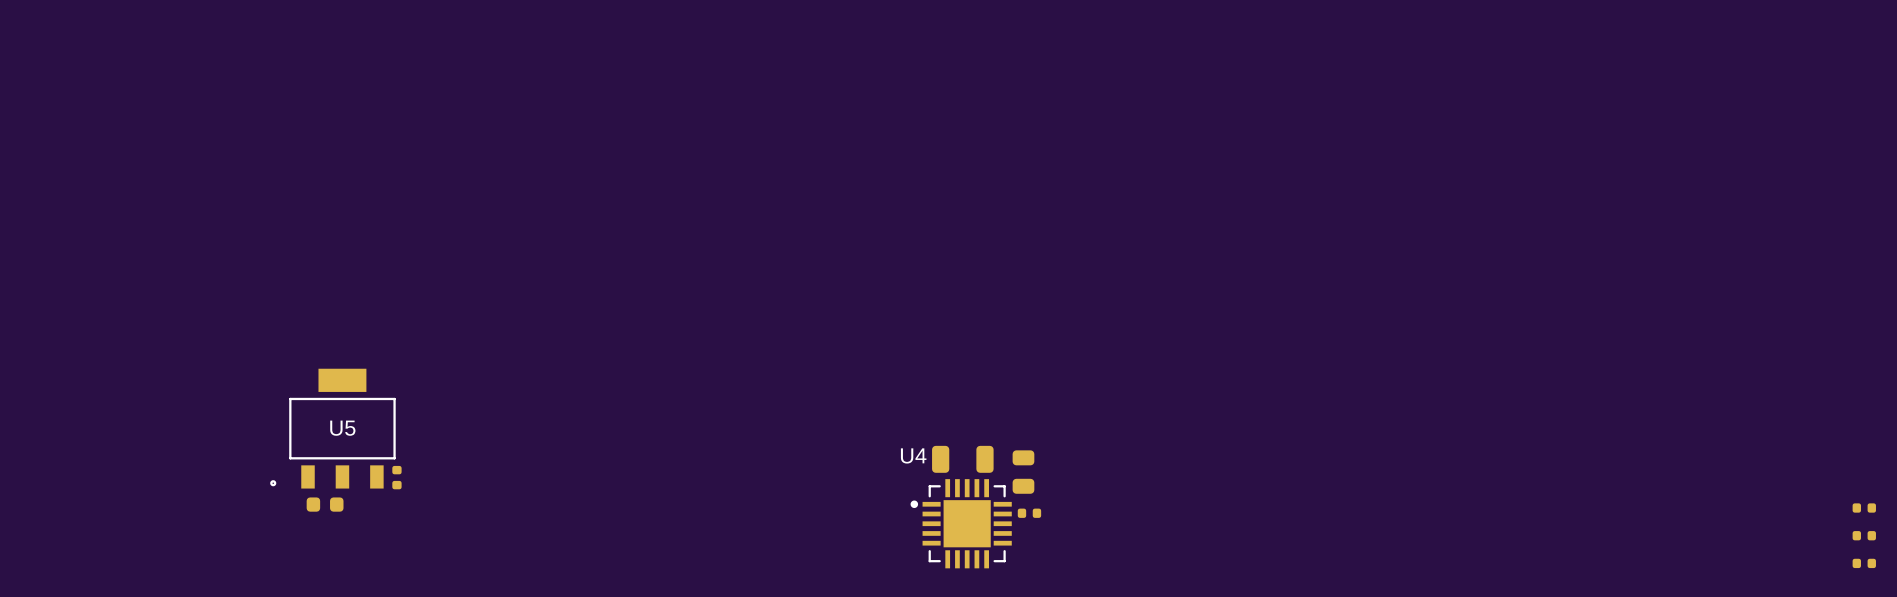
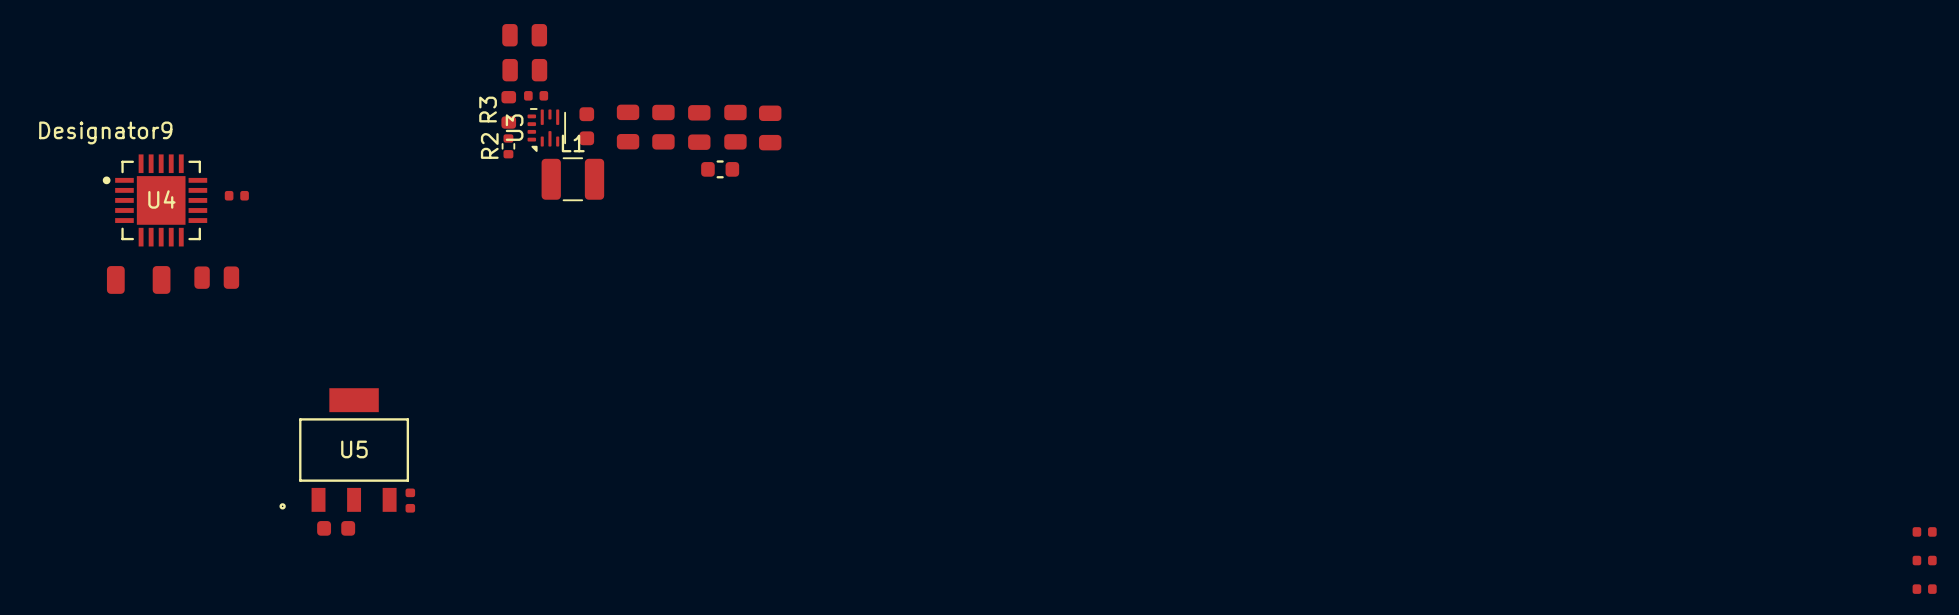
part: none -> (524, 35)
part: none -> (524, 70)
part: none -> (536, 95)
R3: none -> (508, 109)
part: none -> (586, 126)
part: none -> (628, 127)
part: none -> (663, 127)
part: none -> (735, 127)
part: none -> (699, 127)
part: none -> (770, 127)
U3: none -> (546, 130)
U4 text: none -> Designator9 (105, 132)
R2: none -> (508, 146)
part: none -> (720, 169)
L1: none -> (572, 179)
part: none -> (236, 195)
part: none -> (216, 277)
part: none -> (138, 279)
U4 name position: U4 (913, 455) -> U4 (161, 199)
part: (962, 459) -> none
part: (1023, 472) -> none
part: (1029, 513) -> none
U4 position: (961, 523) -> (154, 200)

